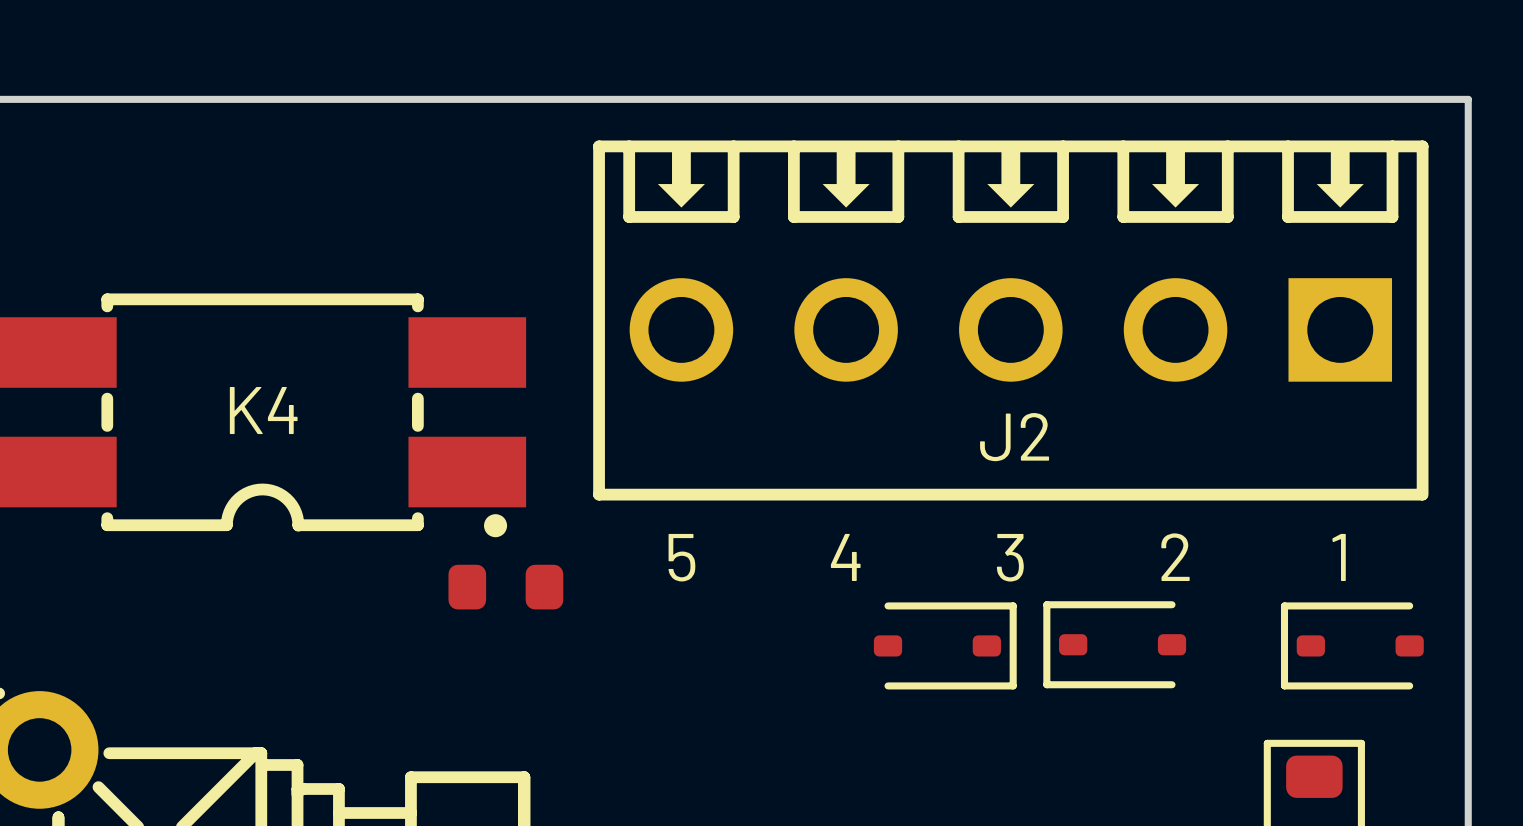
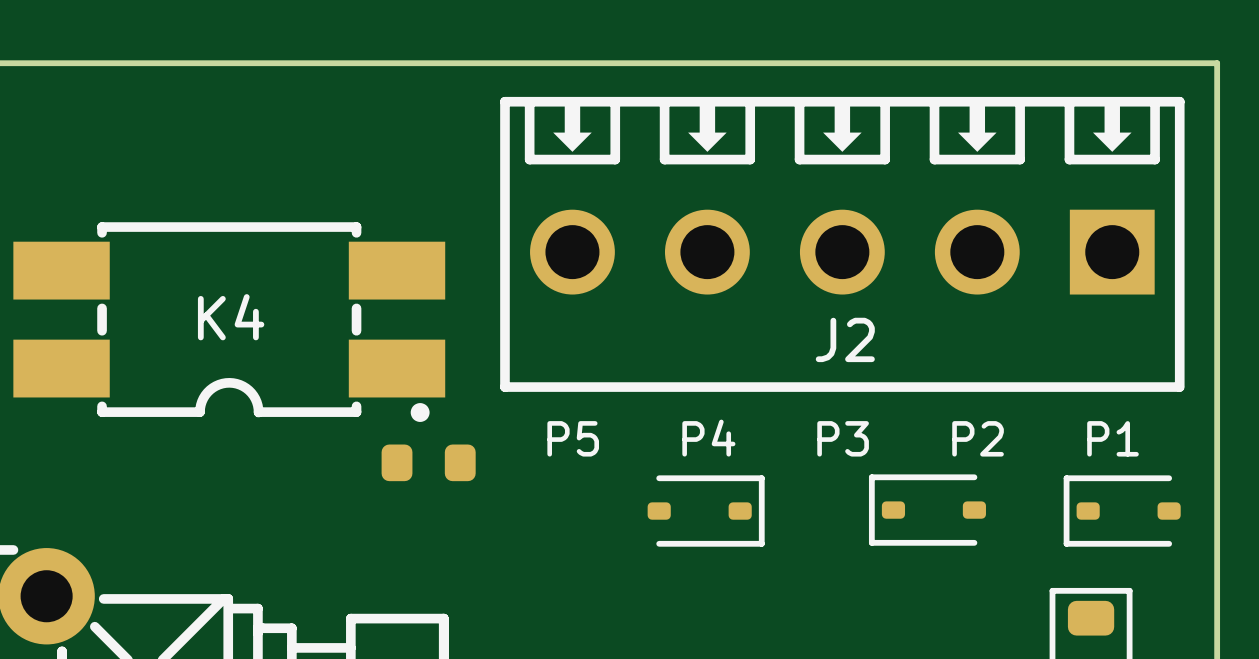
text: 5 (681, 557) -> P5 (573, 438)
text: 4 (845, 557) -> P4 (708, 438)
text: 3 (1010, 557) -> P3 (843, 438)
text: 2 (1175, 557) -> P2 (978, 438)
text: 1 (1339, 557) -> P1 (1113, 438)
part position: (945, 645) -> (706, 511)

